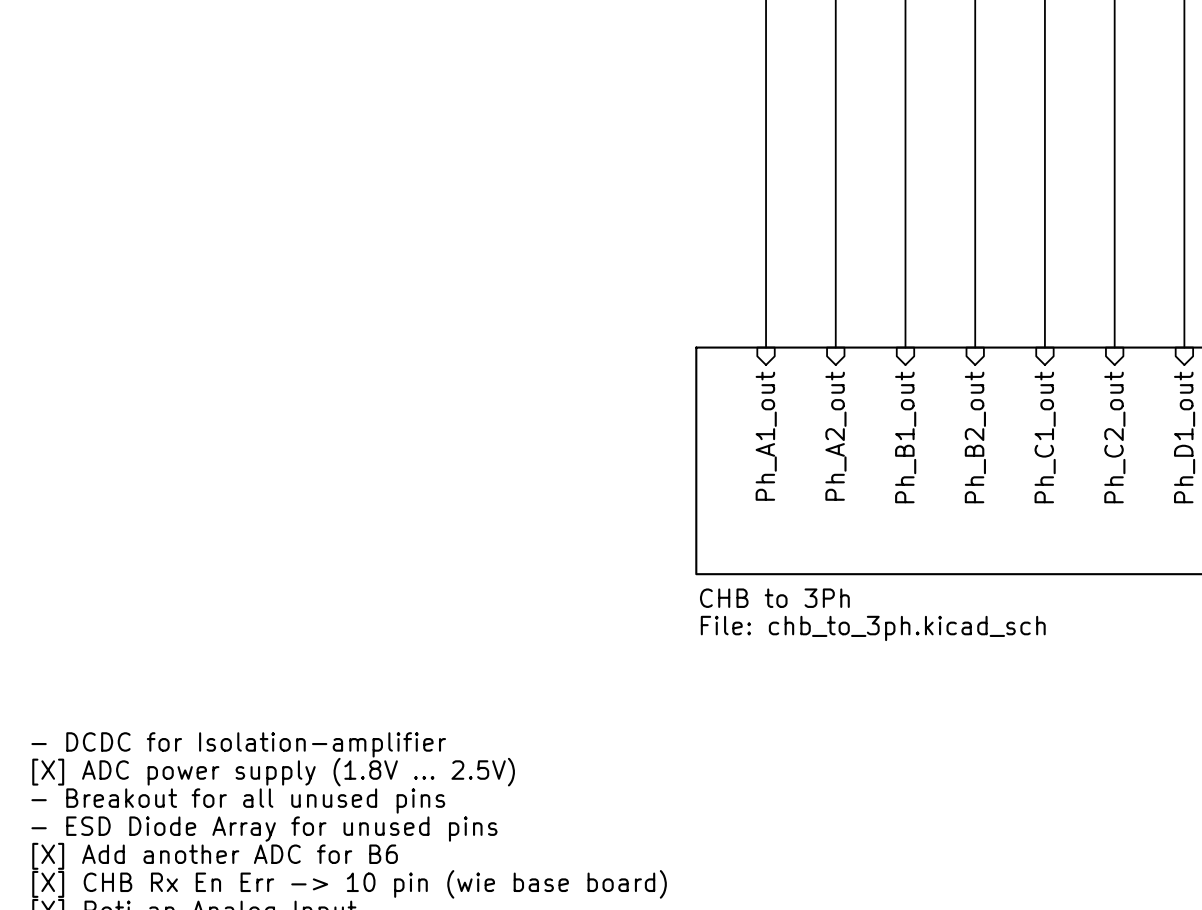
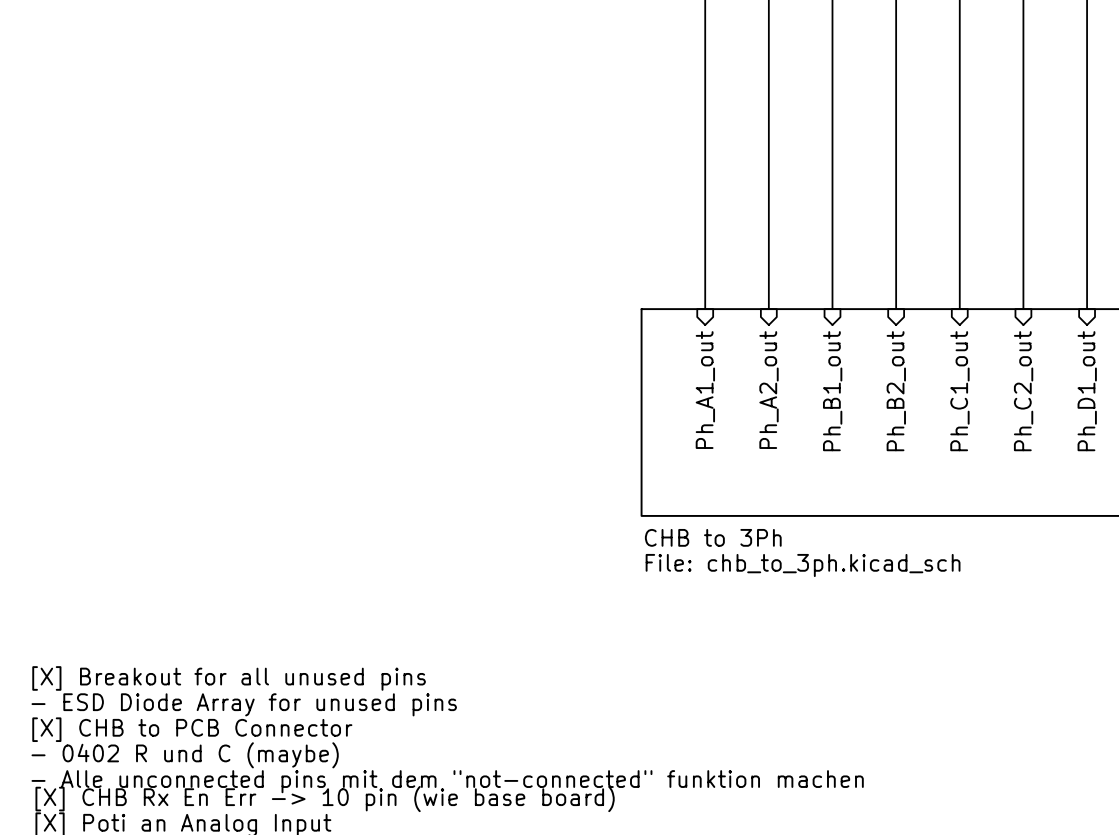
text: - DCDC for Isolation-amplifier (238, 744) -> [X] Breakout for all unused pins (229, 678)
text: [X] ADC power supply (1.8V ... 2.5V) (273, 772) -> none
text: - Breakout for all unused pins (238, 801) -> [X] CHB to PCB Connector (192, 729)
text position: - ESD Diode Array for unused pins (264, 829) -> - ESD Diode Array for unused pins (244, 704)
text: none -> - 0402 R und C (maybe) (185, 755)
text: [X] Add another ADC for B6 (215, 856) -> - Alle unconnected pins mit dem "not-connected" funktion machen (447, 781)

